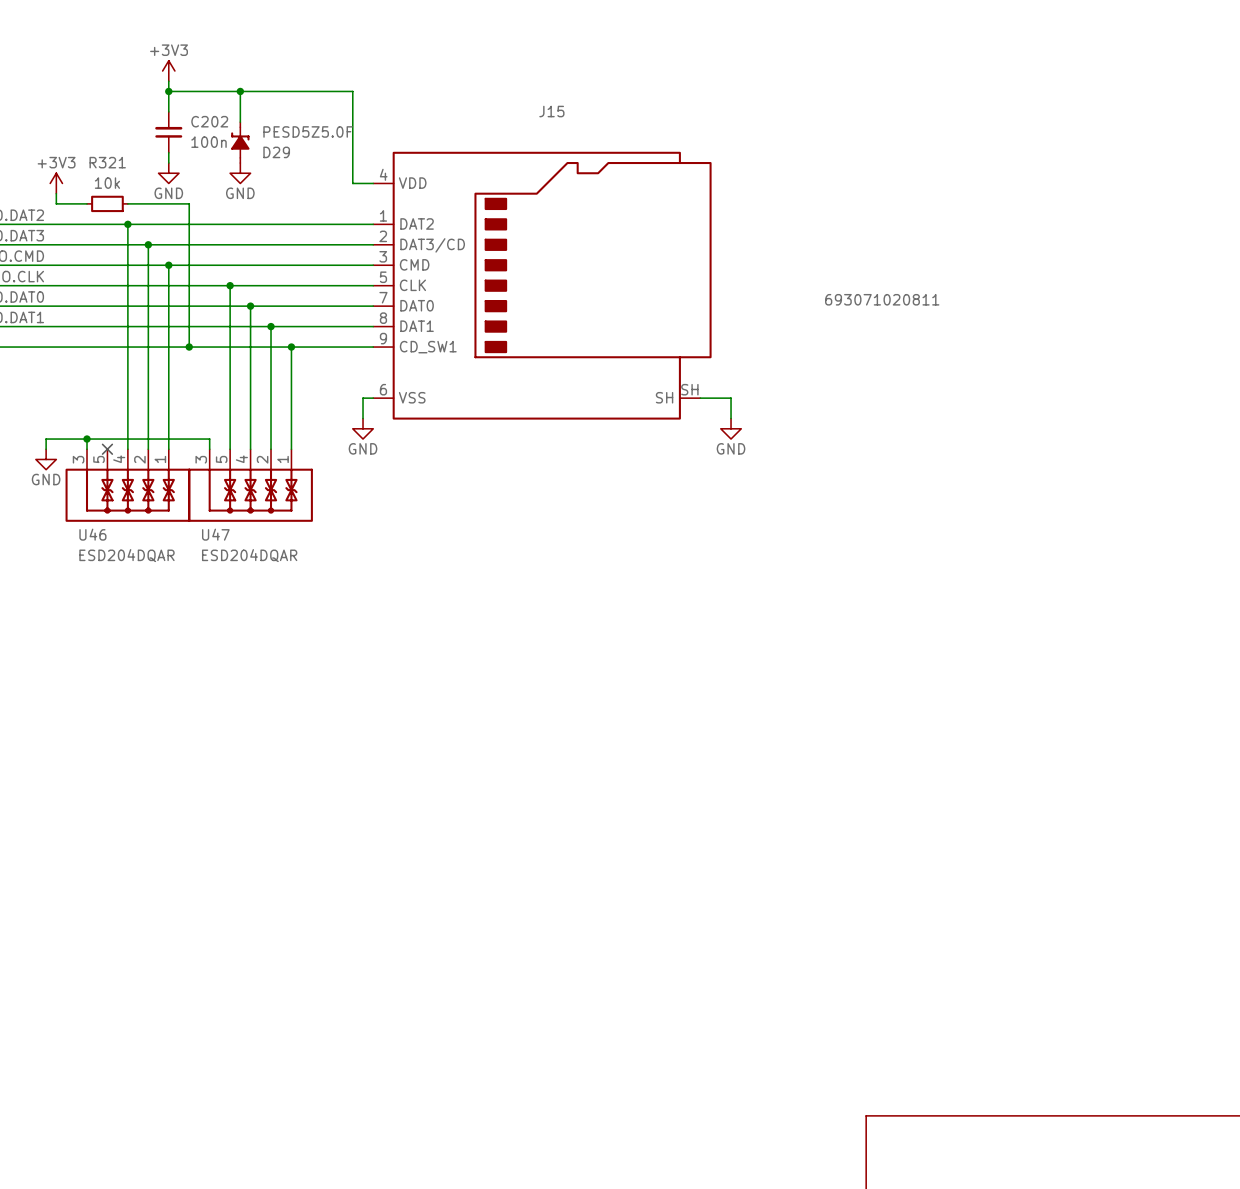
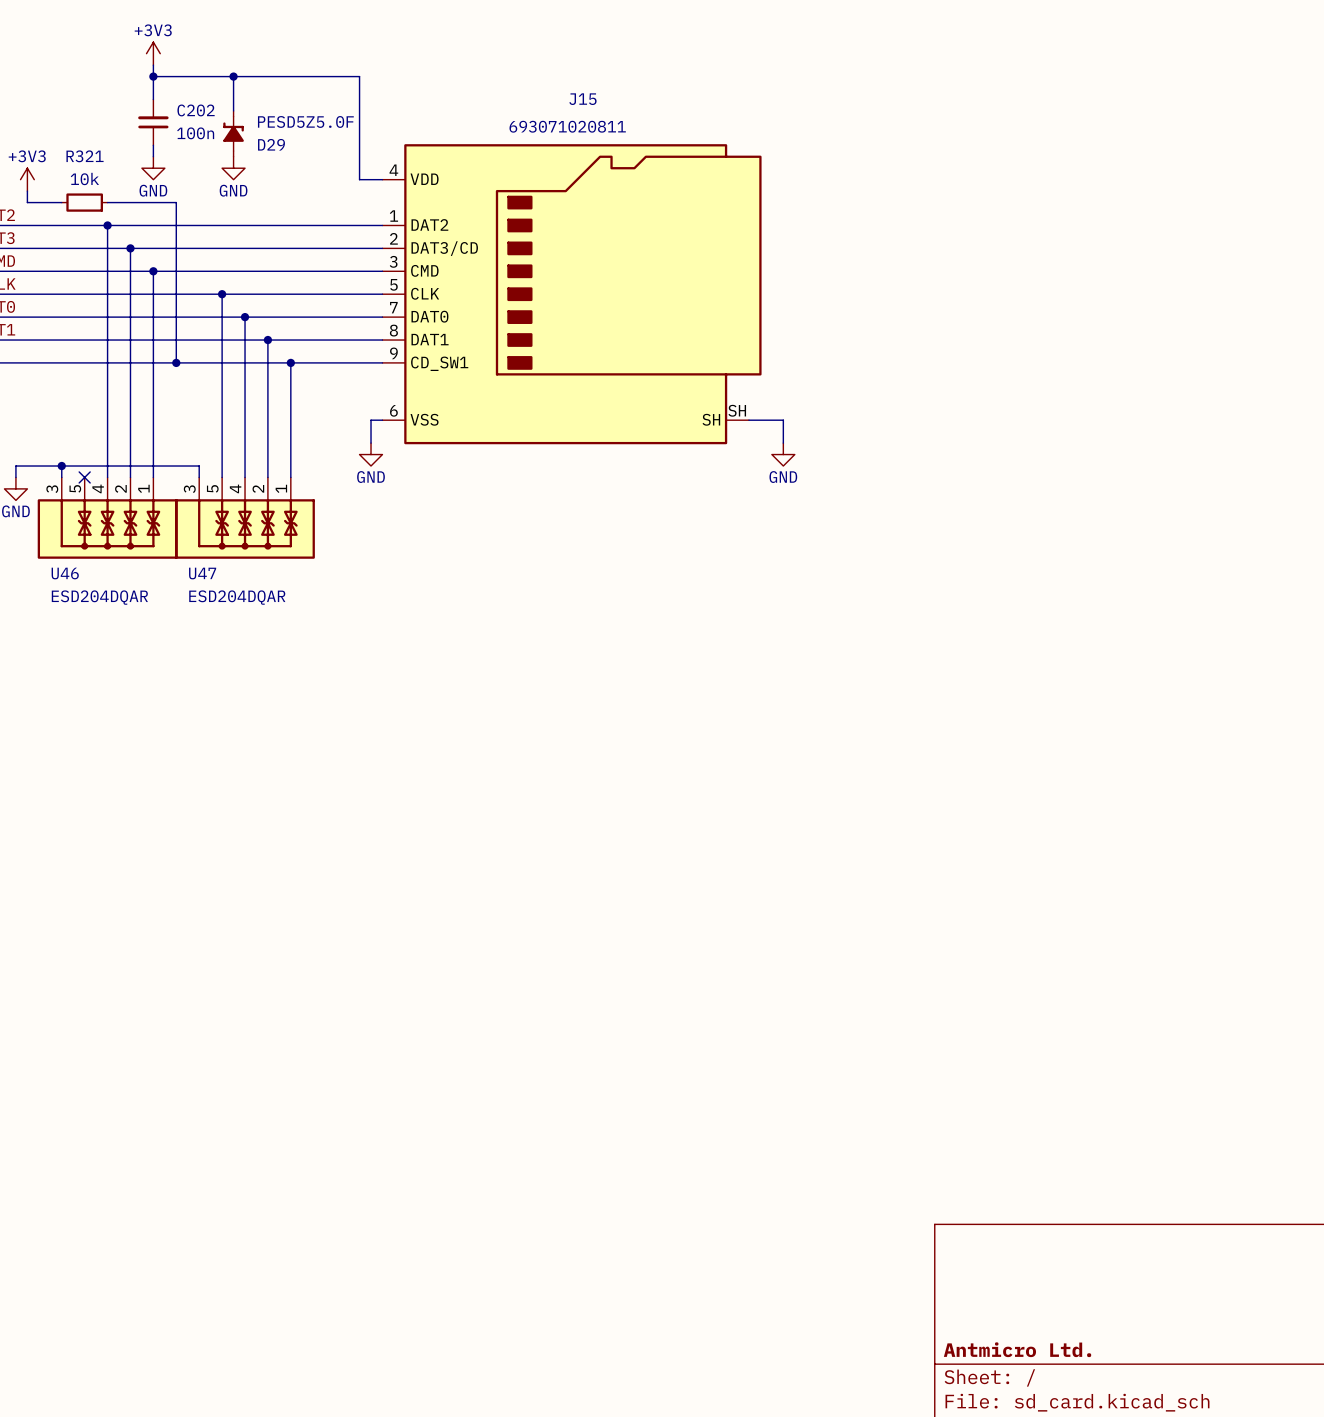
J15 text position: 693071020811 (882, 299) -> 693071020811 (567, 126)

